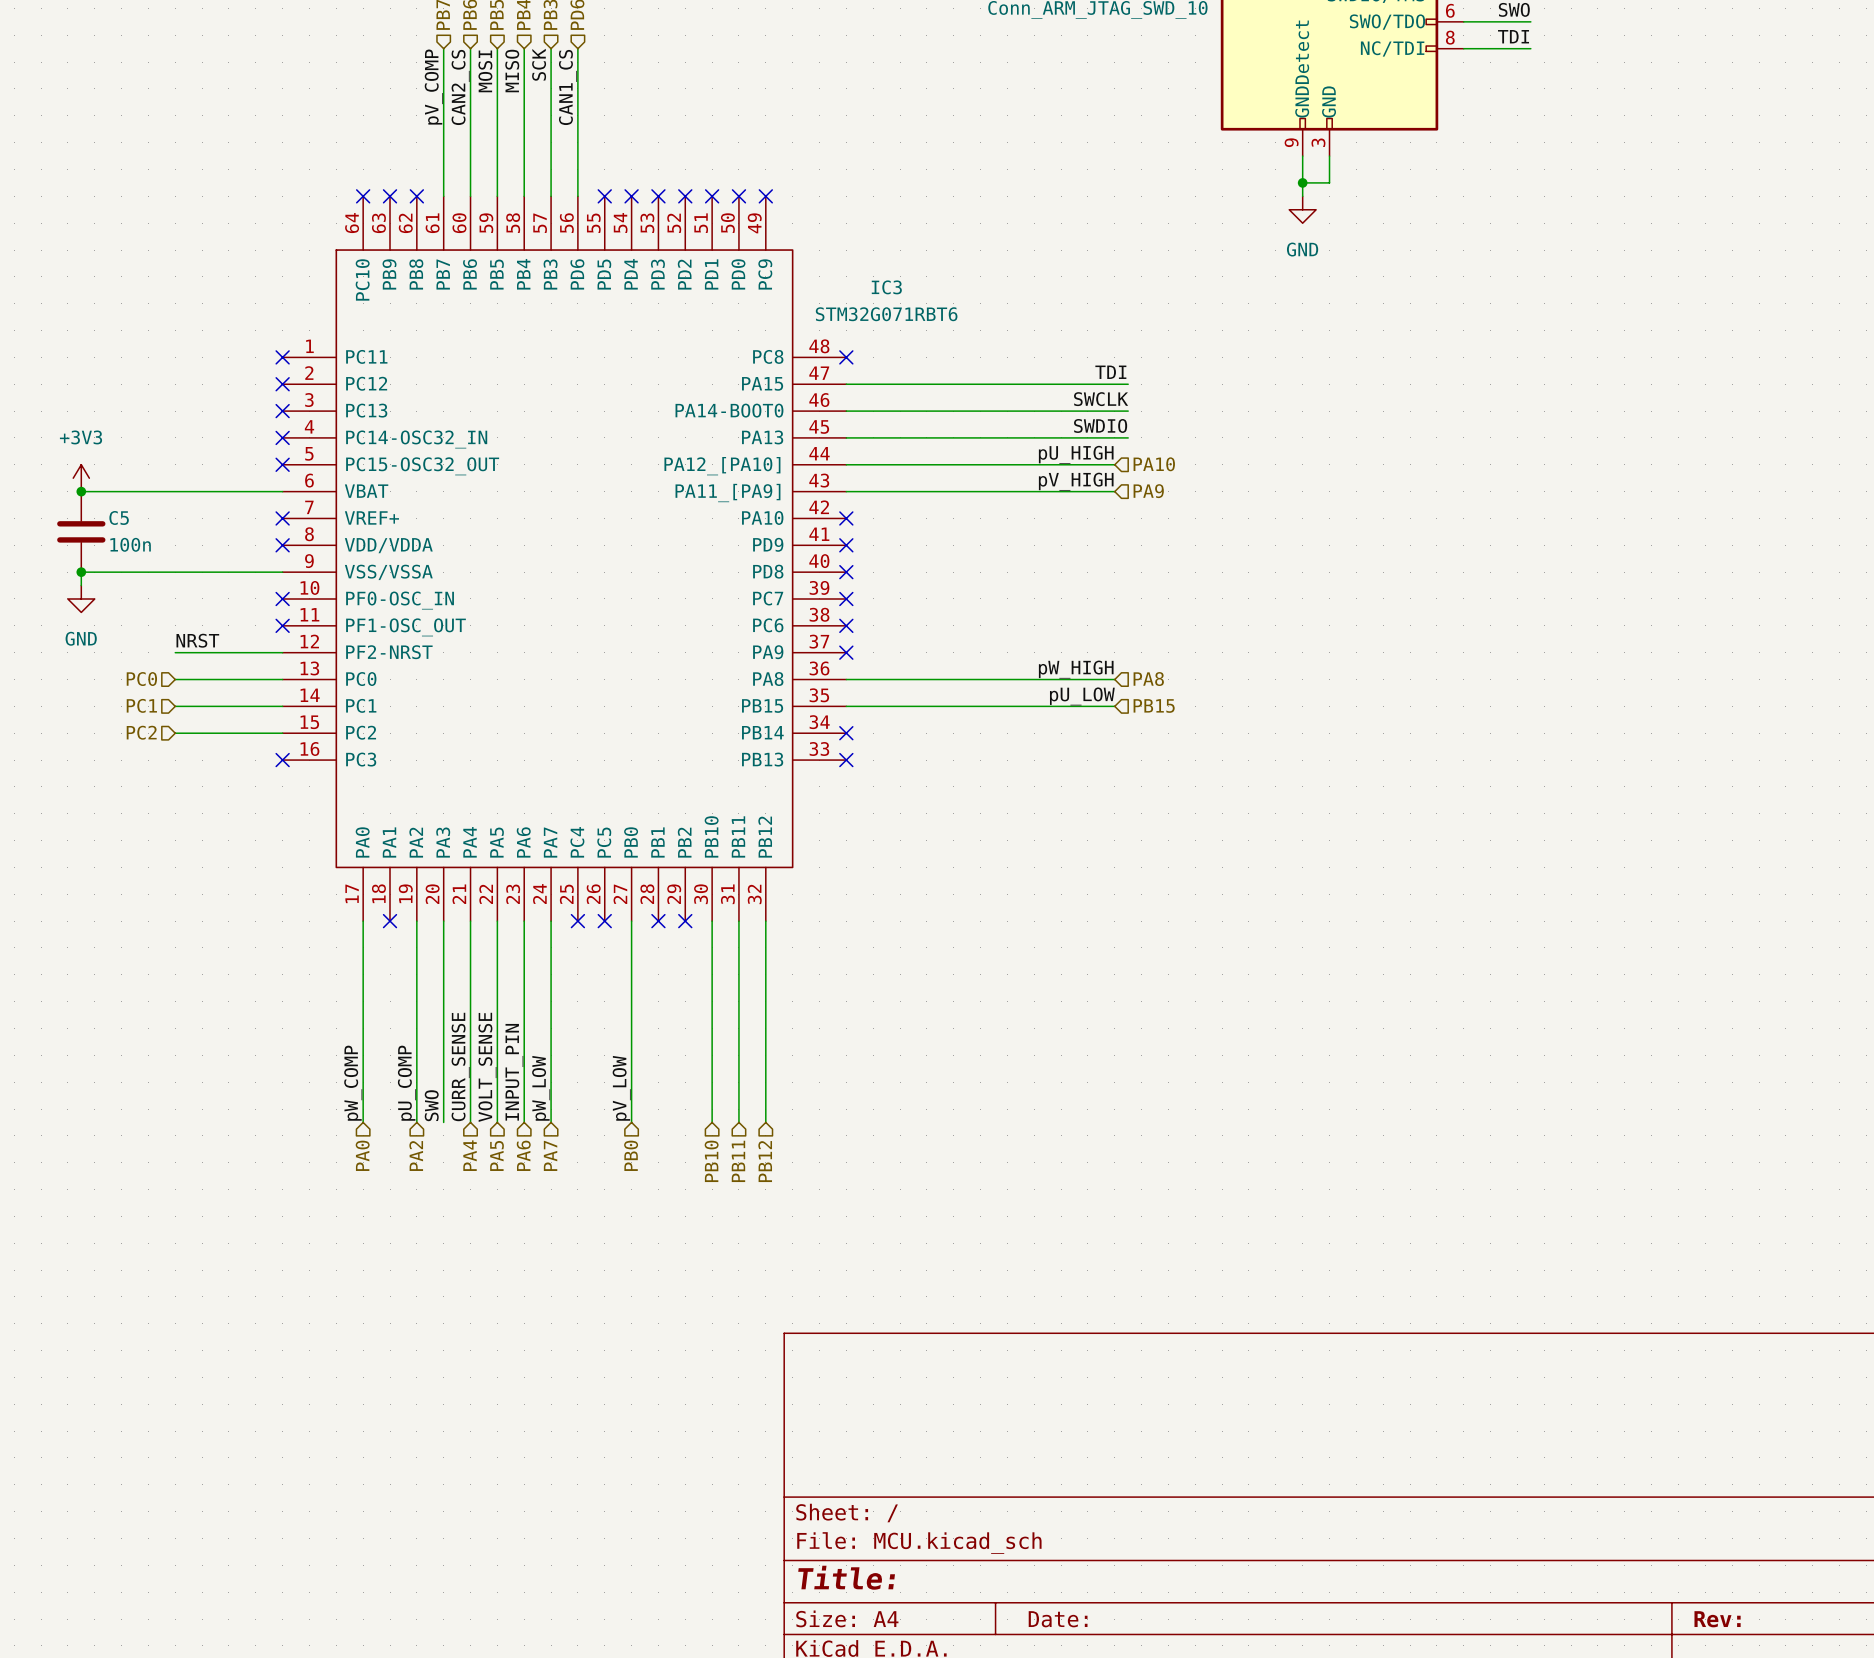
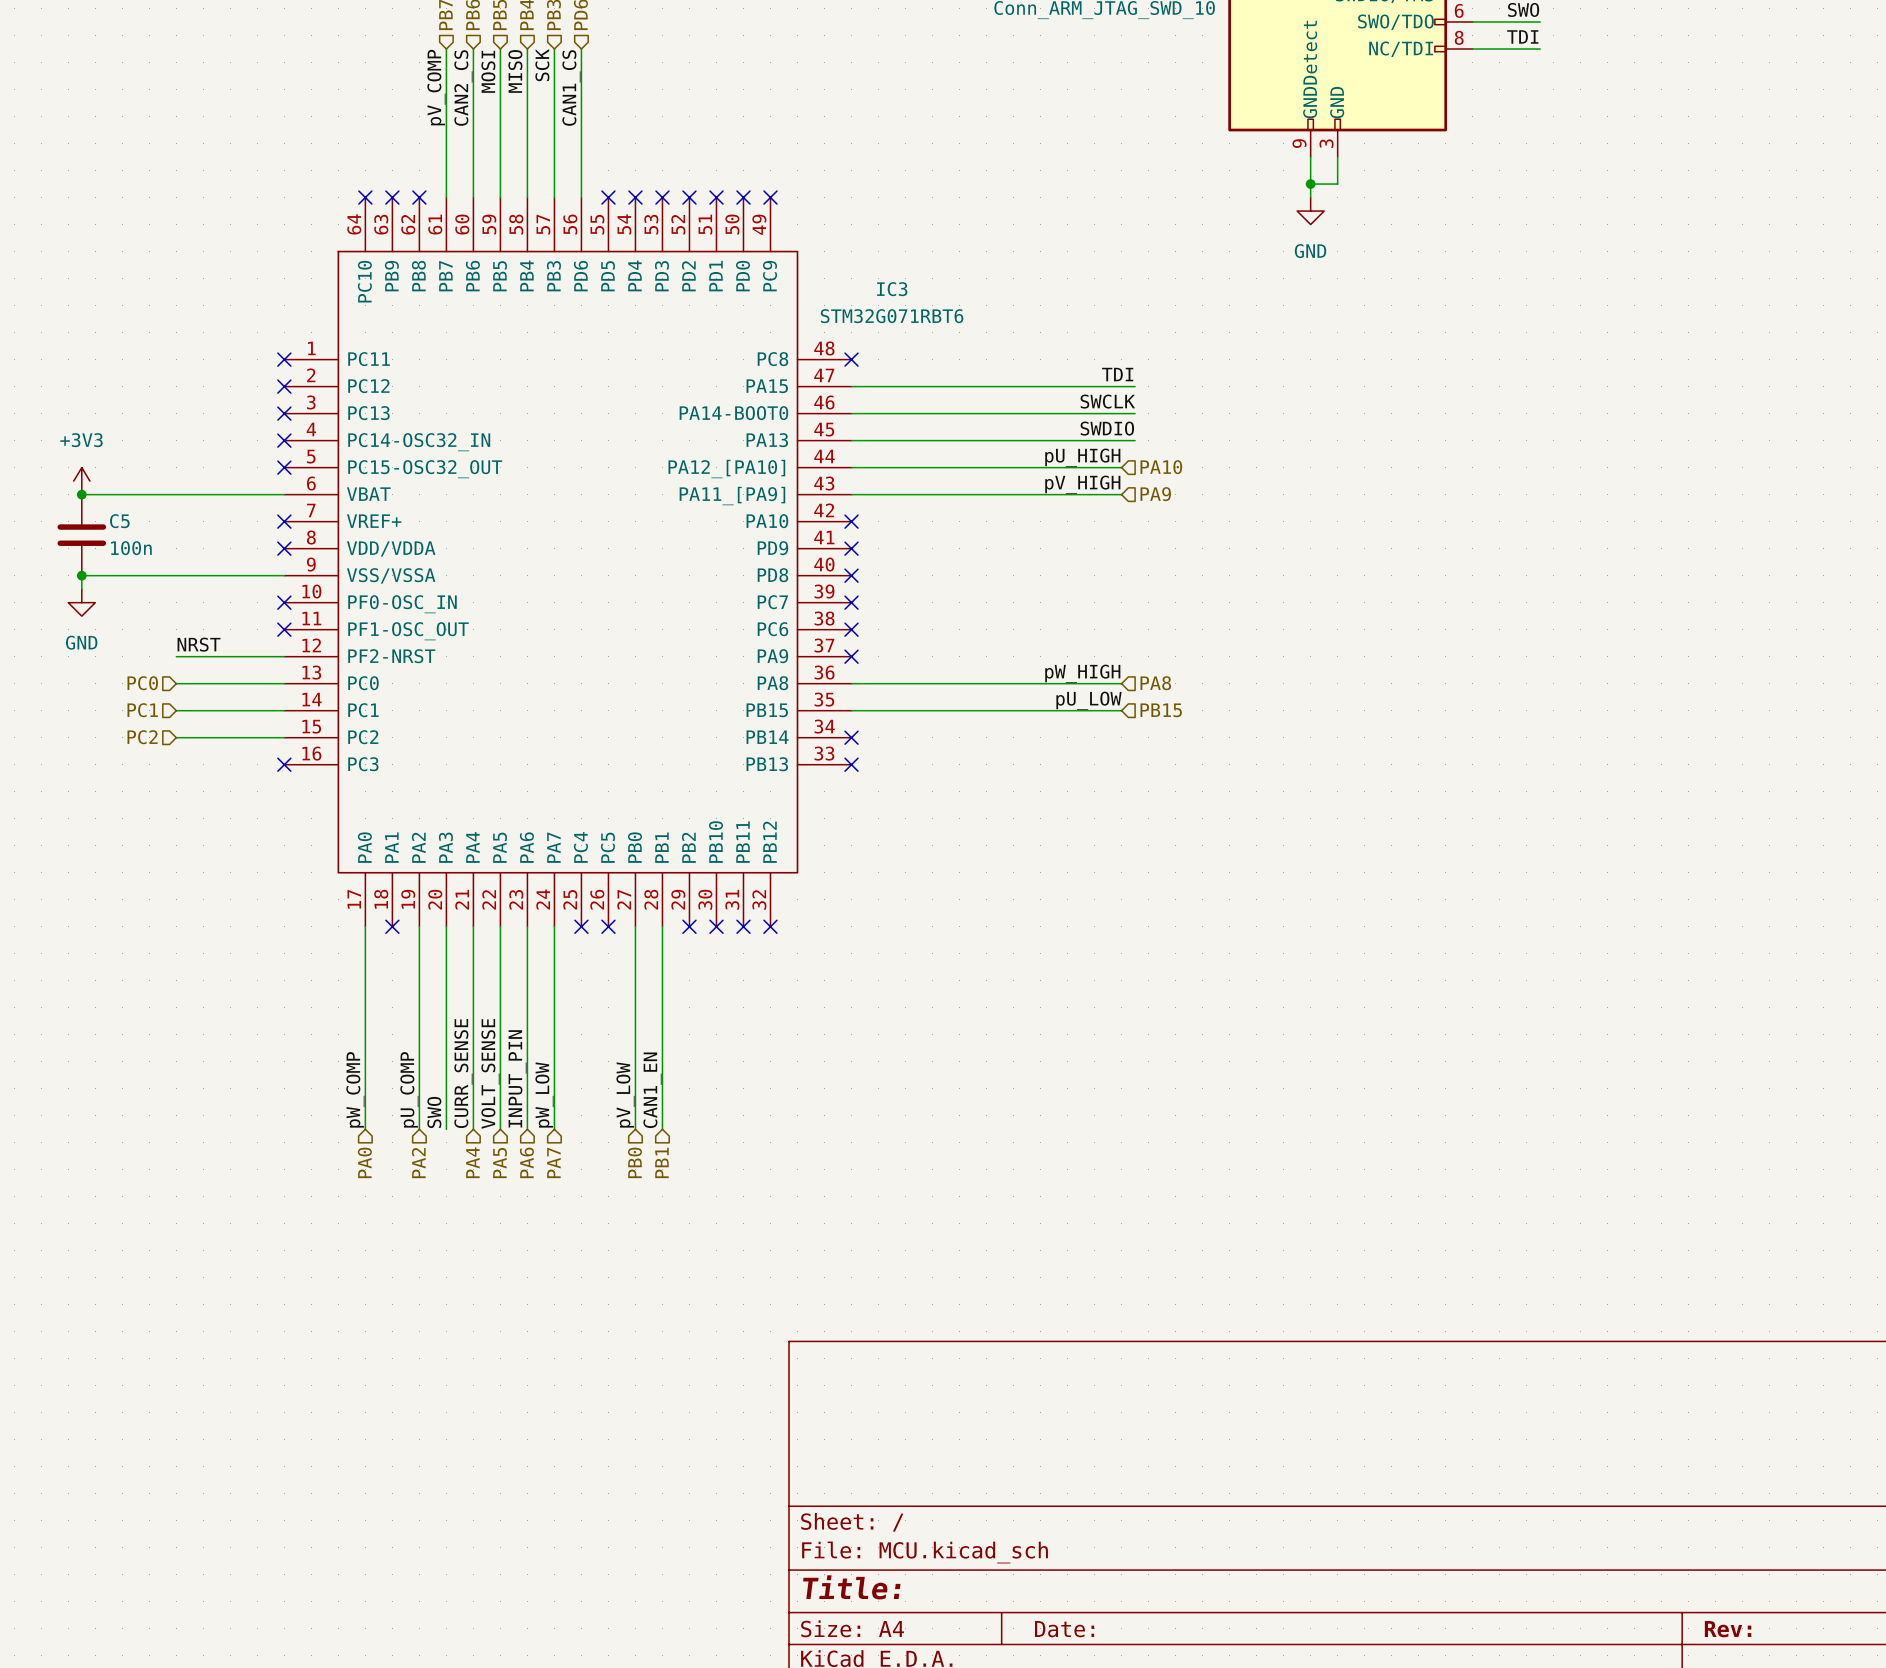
no-connect mark: (658, 921) -> none
wire: (712, 921) (712, 1122) -> (662, 926) (662, 1129)
no-connect mark: none -> (716, 926)
wire: (738, 921) (738, 1122) -> none
no-connect mark: none -> (743, 926)
wire: (765, 921) (765, 1122) -> none
no-connect mark: none -> (770, 926)
label: none -> CAN1_EN (652, 1090)
hierarchical label: none -> PB1 (661, 1162)
hierarchical label: PB10 (711, 1161) -> none
hierarchical label: PB11 (738, 1161) -> none
hierarchical label: PB12 (765, 1161) -> none

